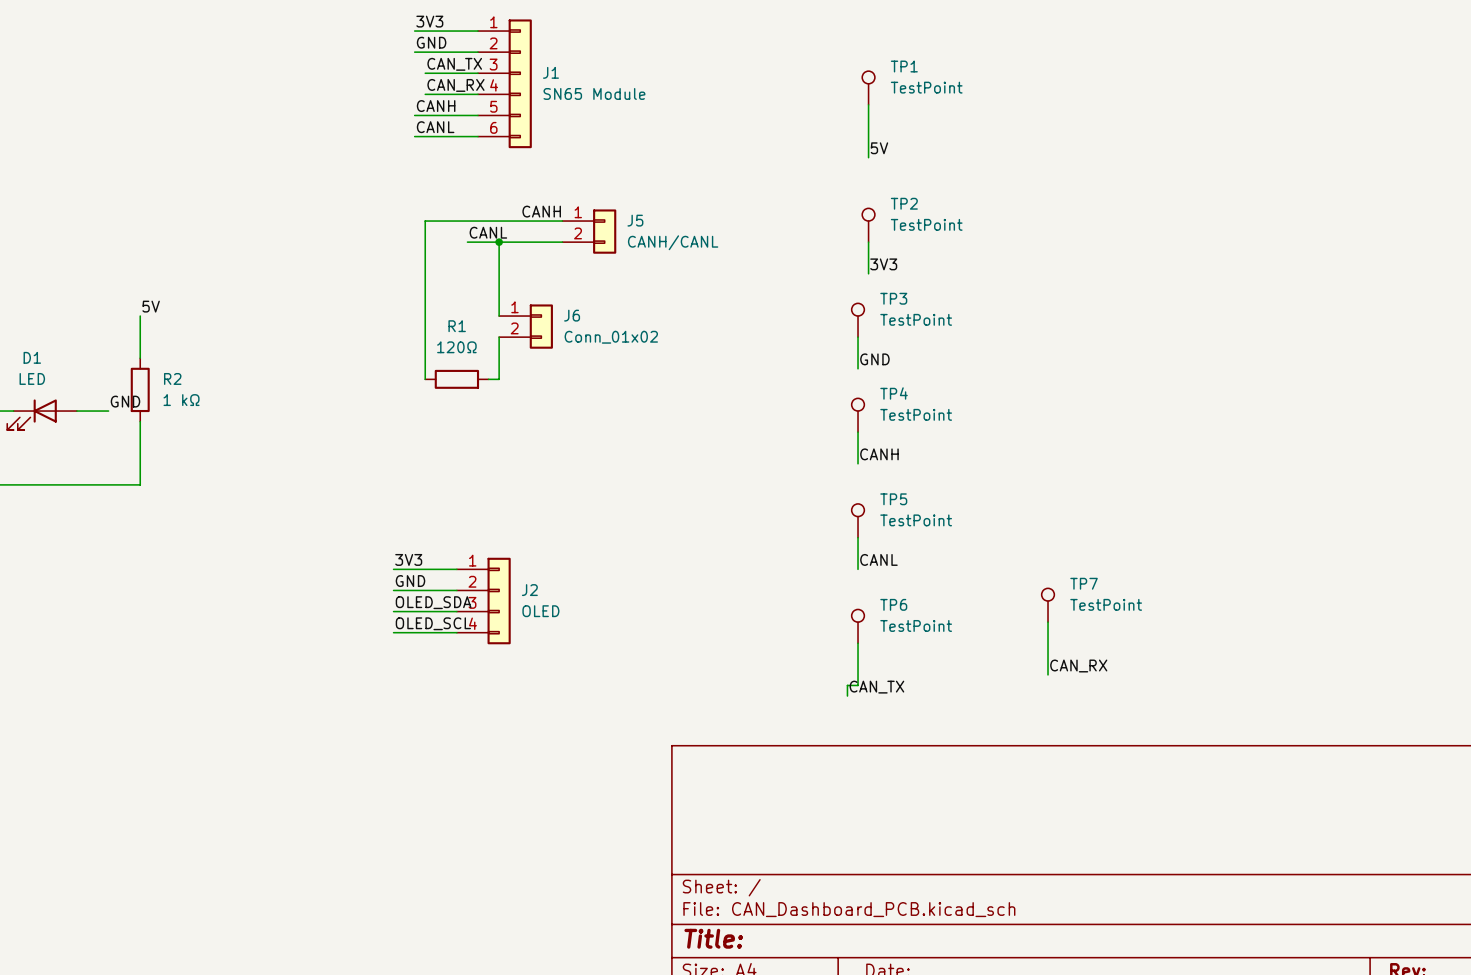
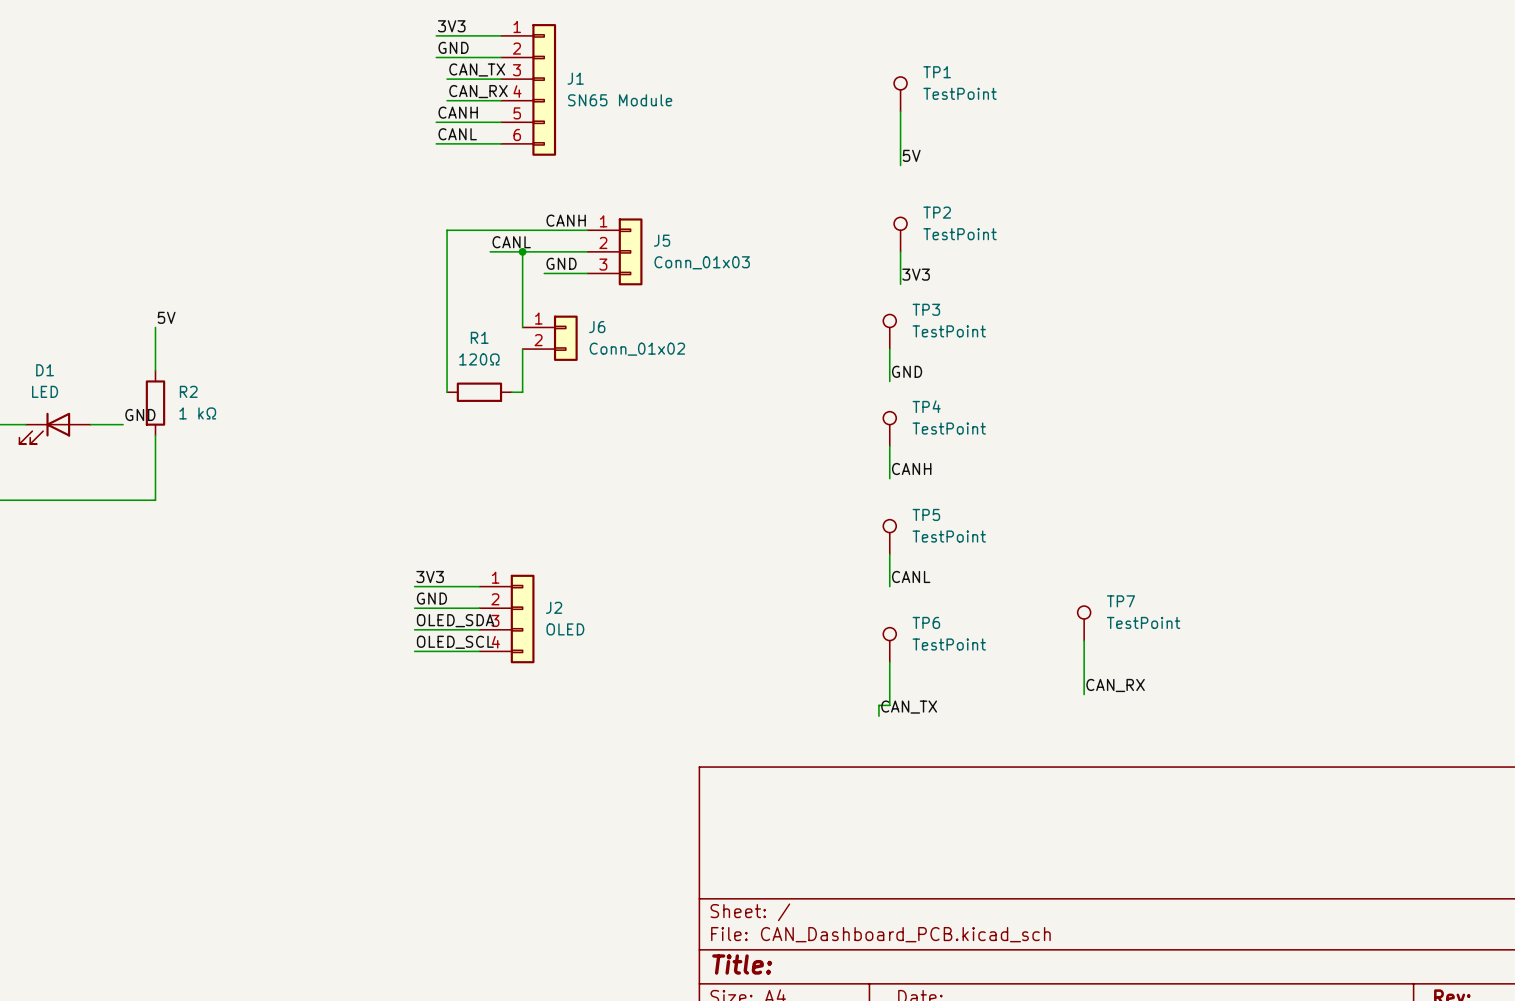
J5 symbol: [562, 209, 617, 254] -> [587, 218, 643, 286]
J5 value: CANH/CANL (673, 242) -> Conn_01x03 (702, 262)
label: none -> GND (561, 263)
wire: none -> (544, 273) (587, 273)

